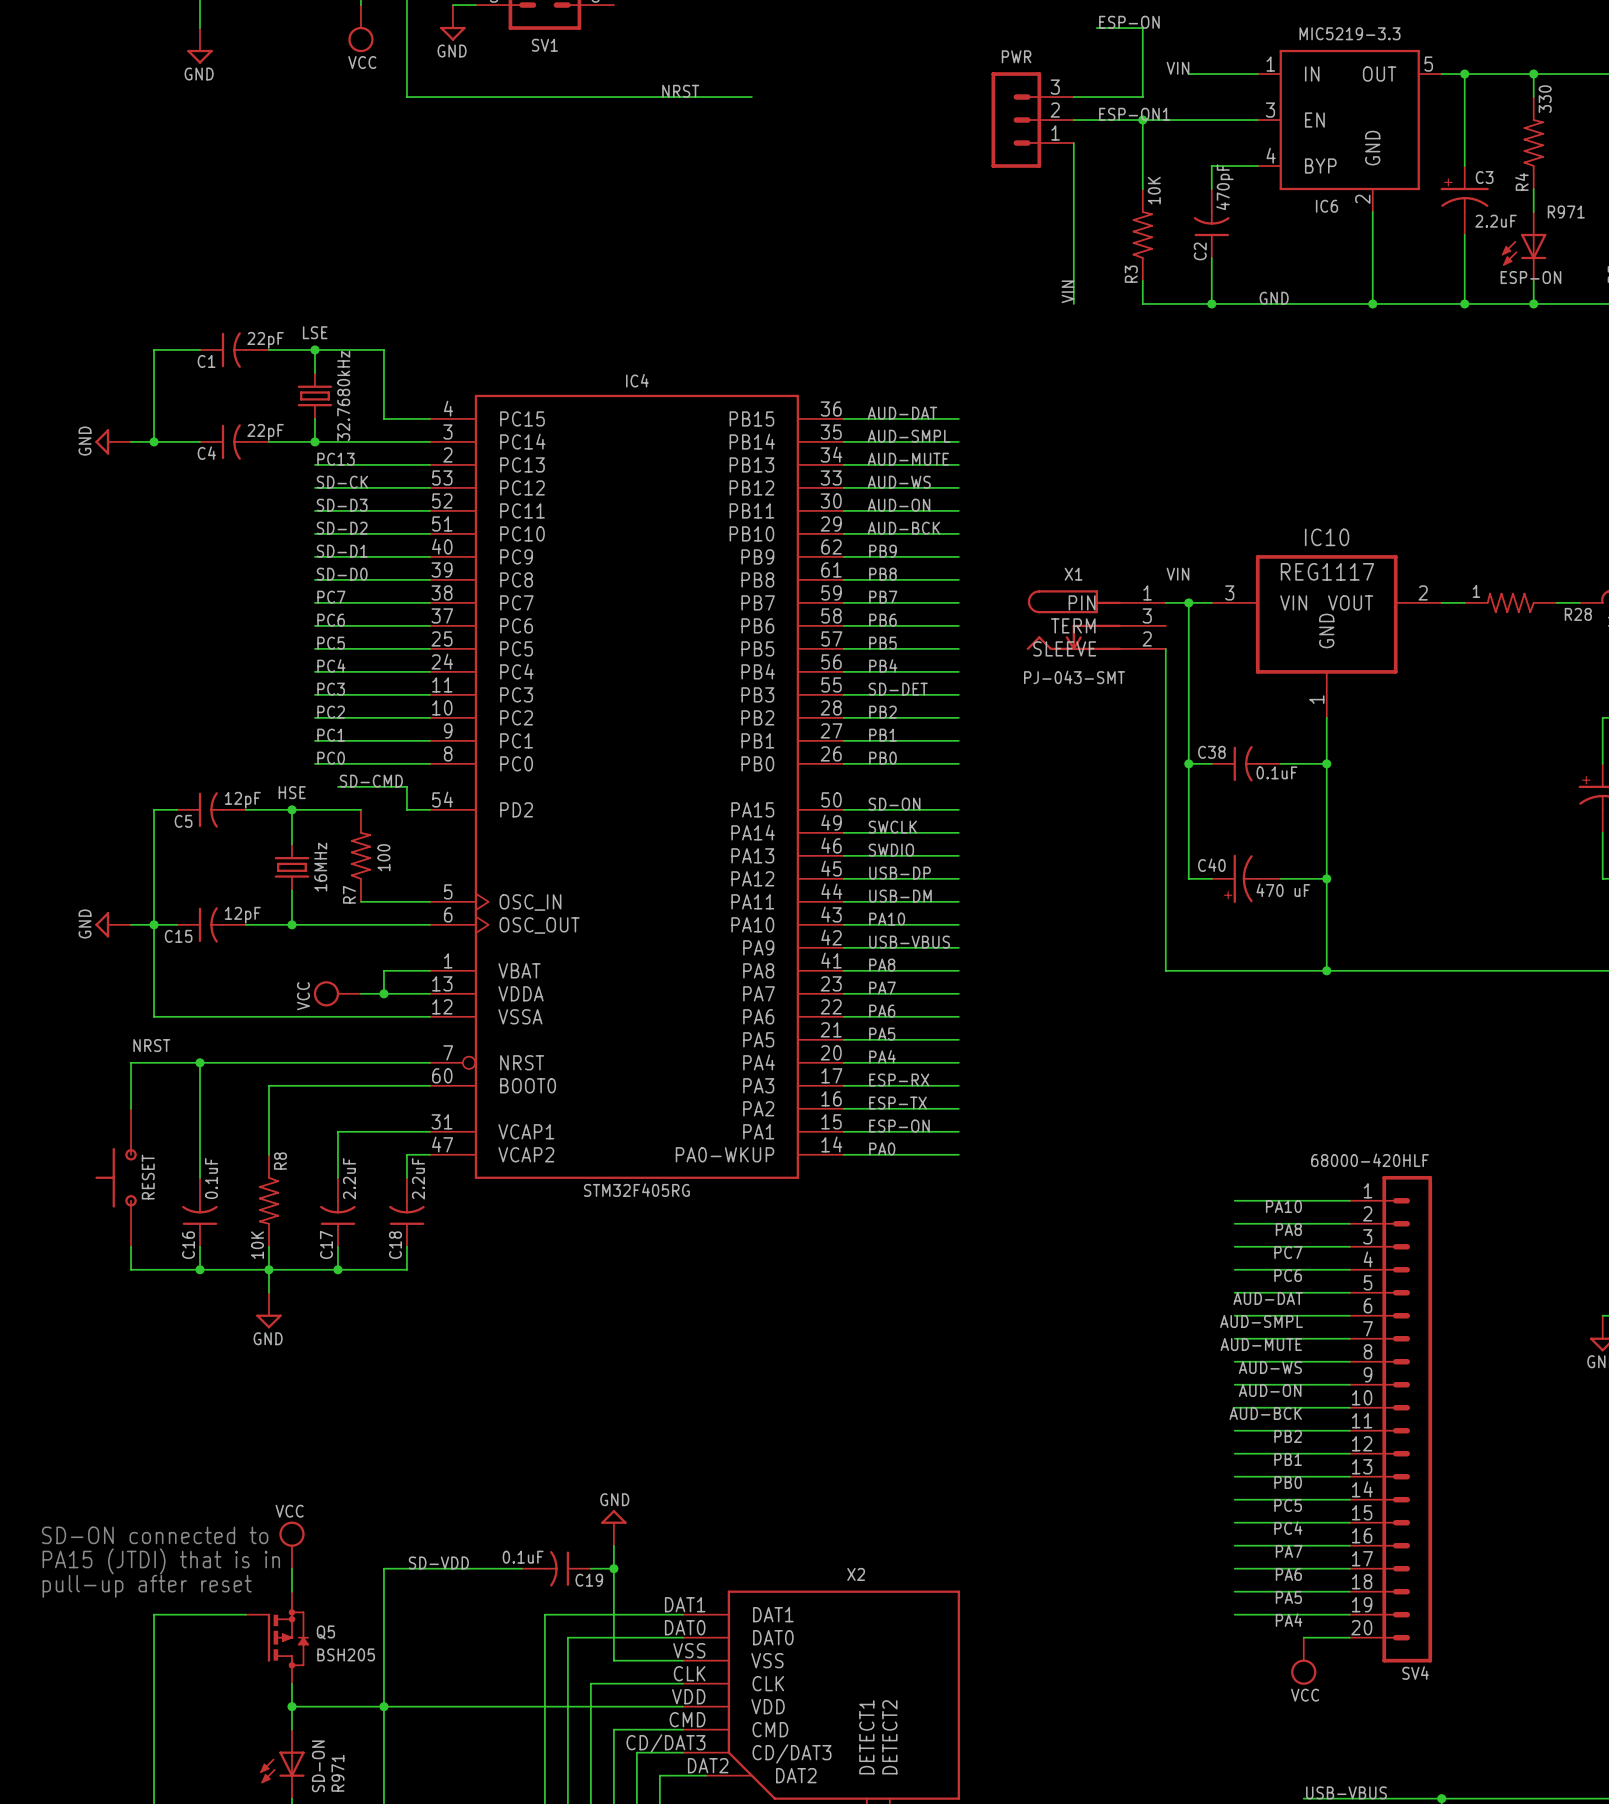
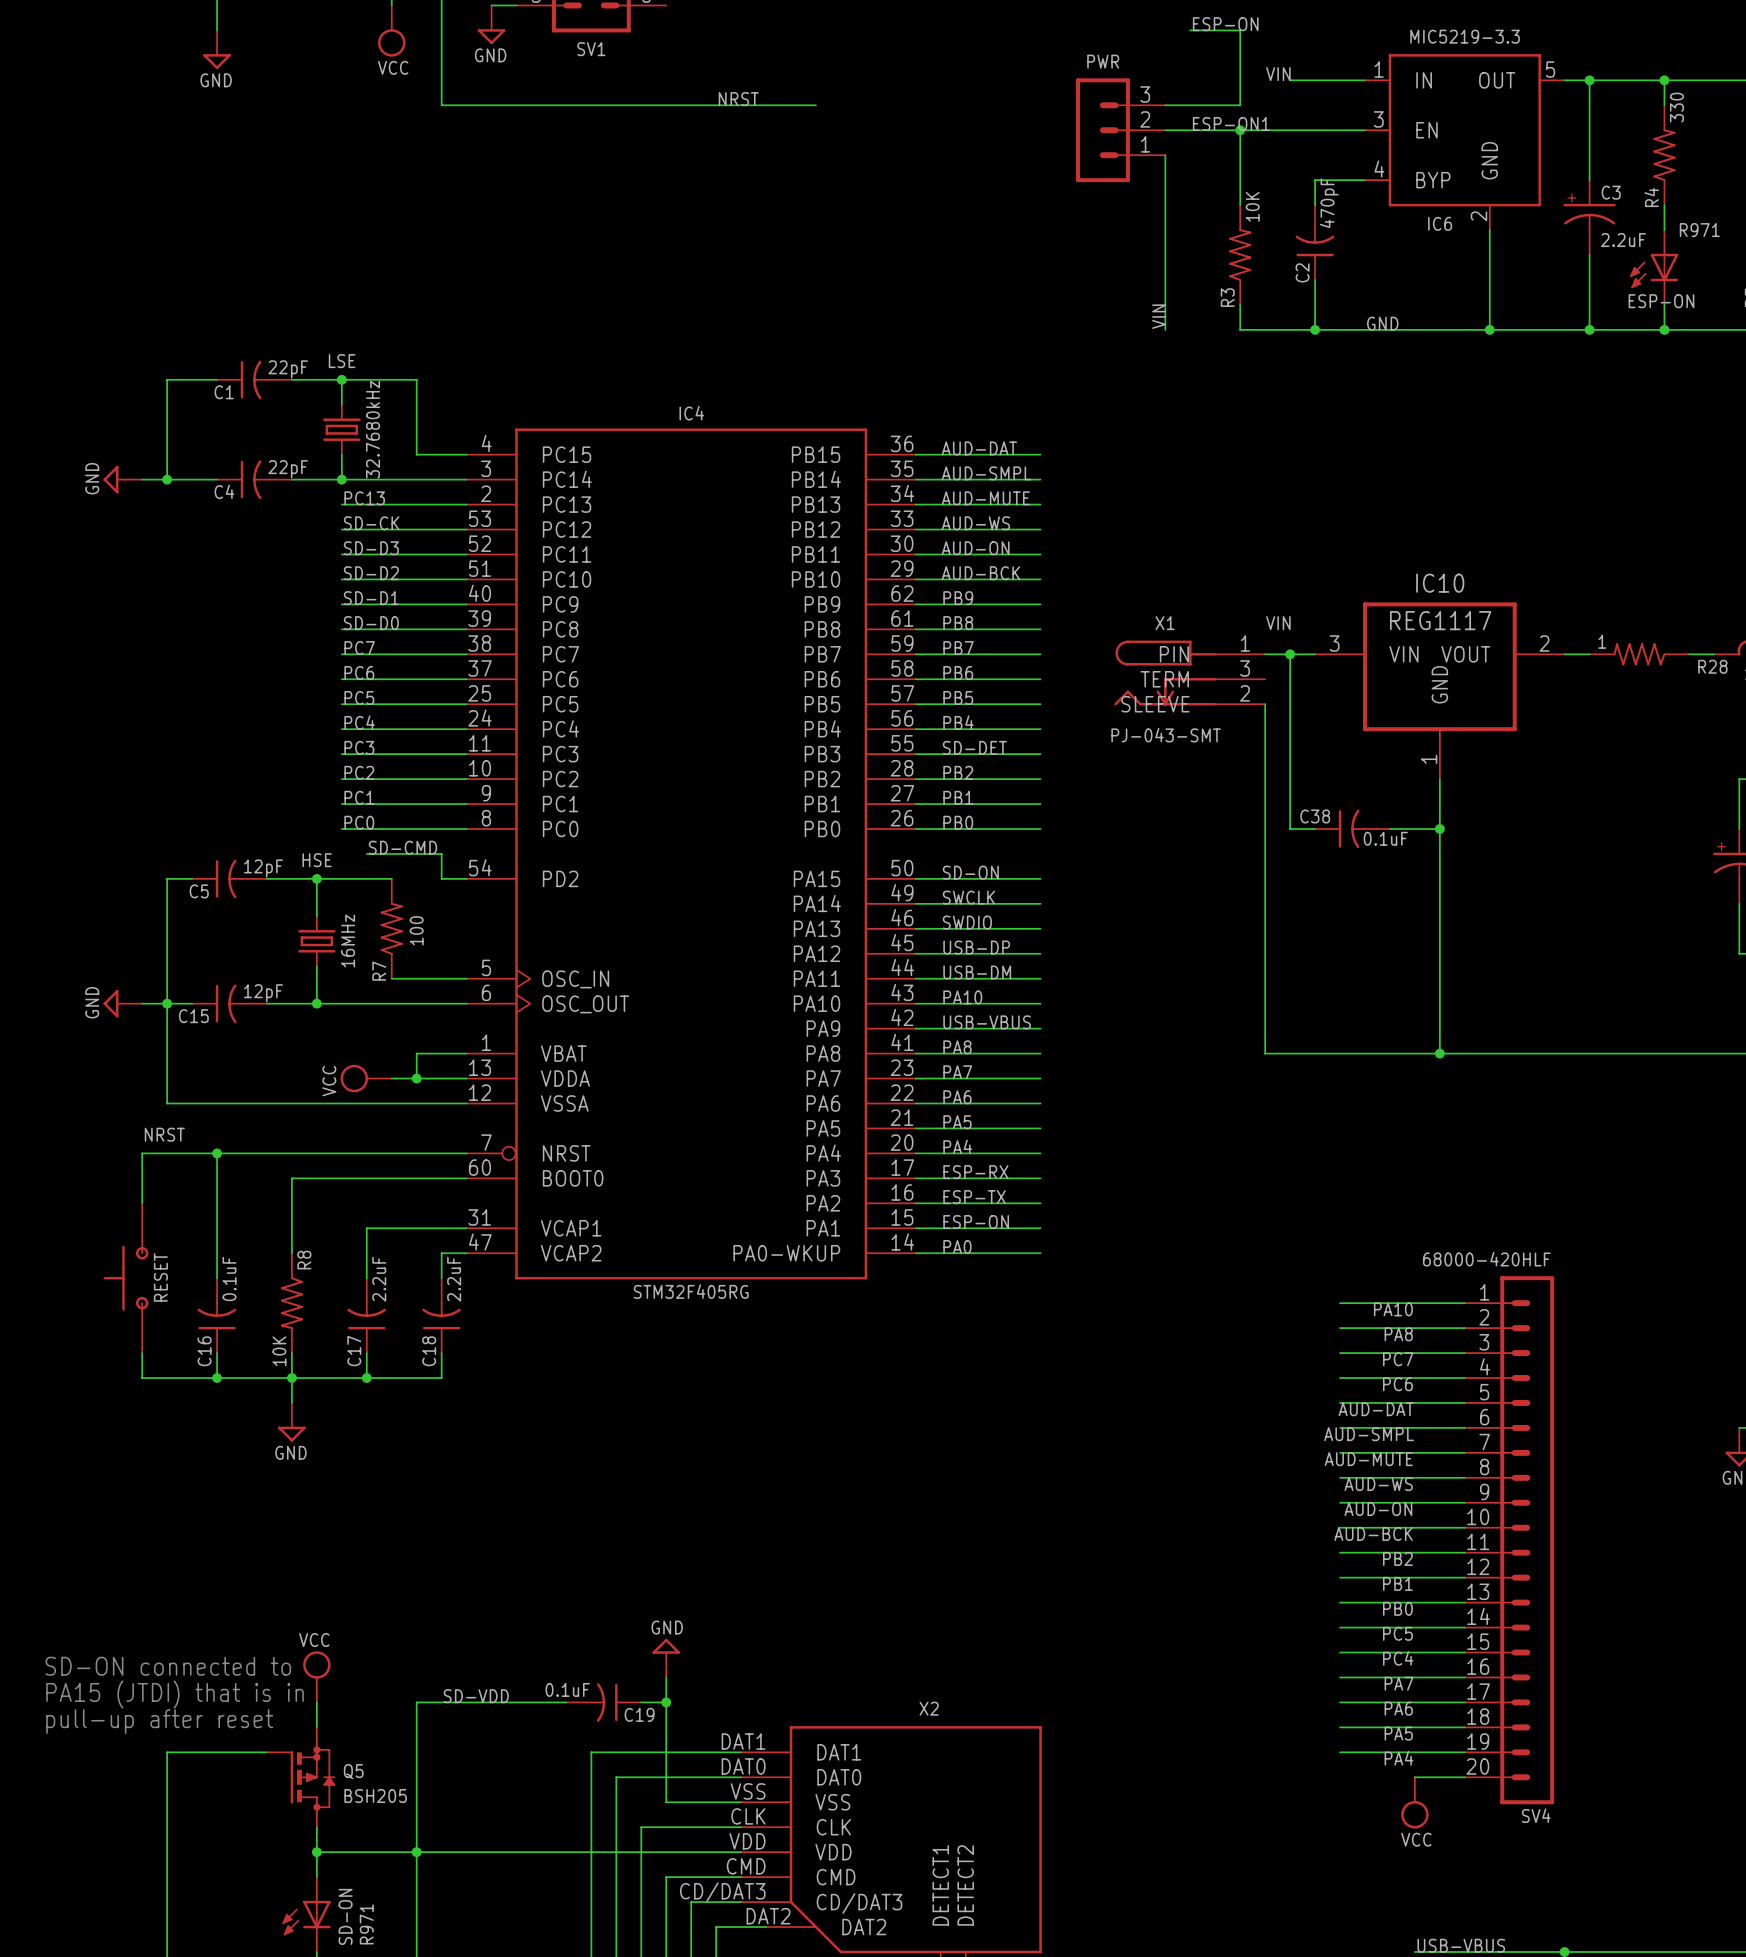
wire: (1188, 763) (1188, 878) (1211, 878) -> none
junction: (1188, 763) -> none
C40: 470 uF (1246, 878) -> none
wire: (1280, 878) (1326, 878) -> none
junction: (1326, 878) -> none

